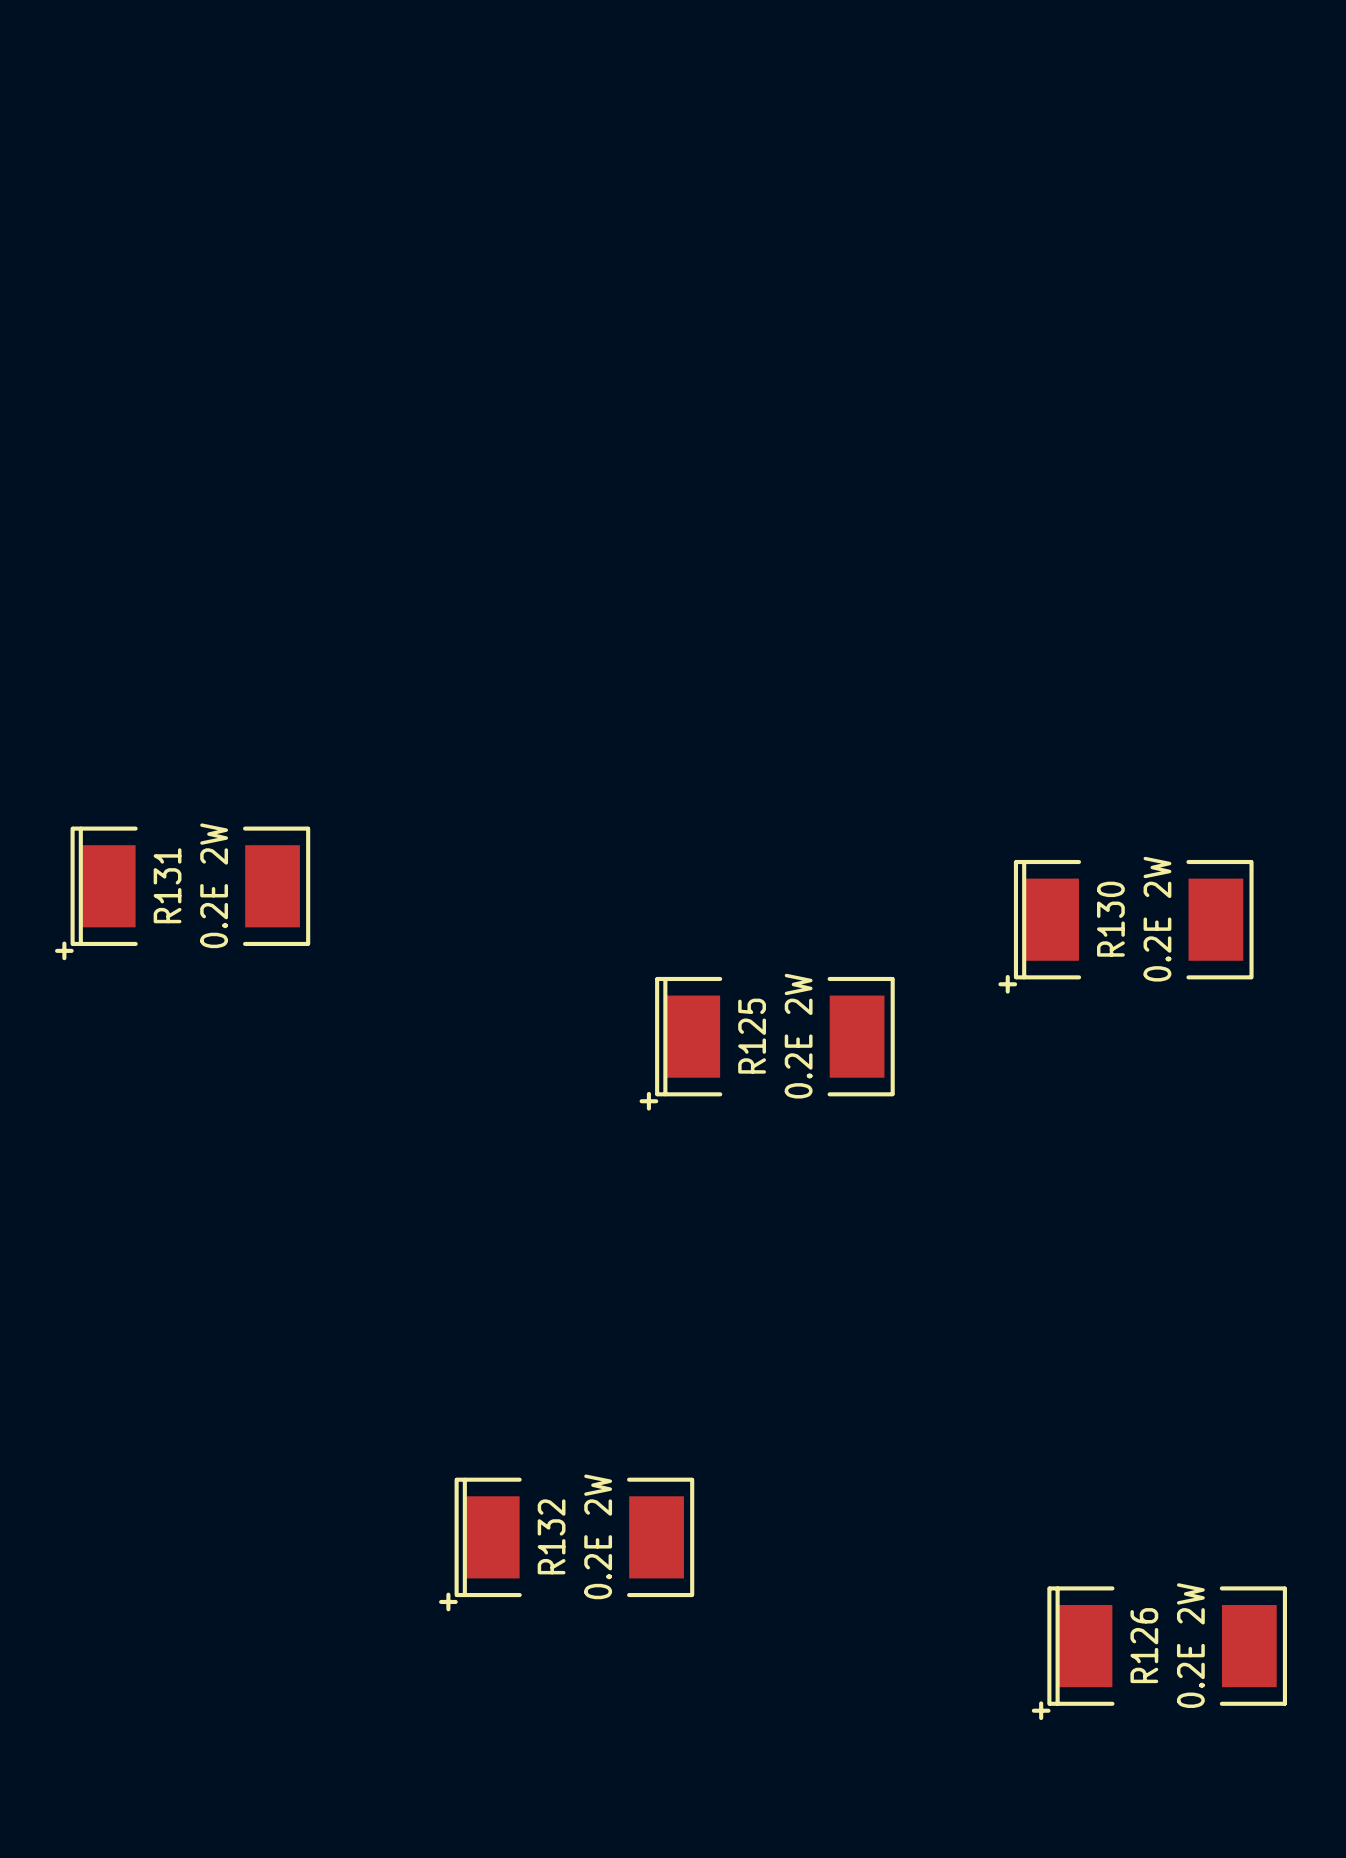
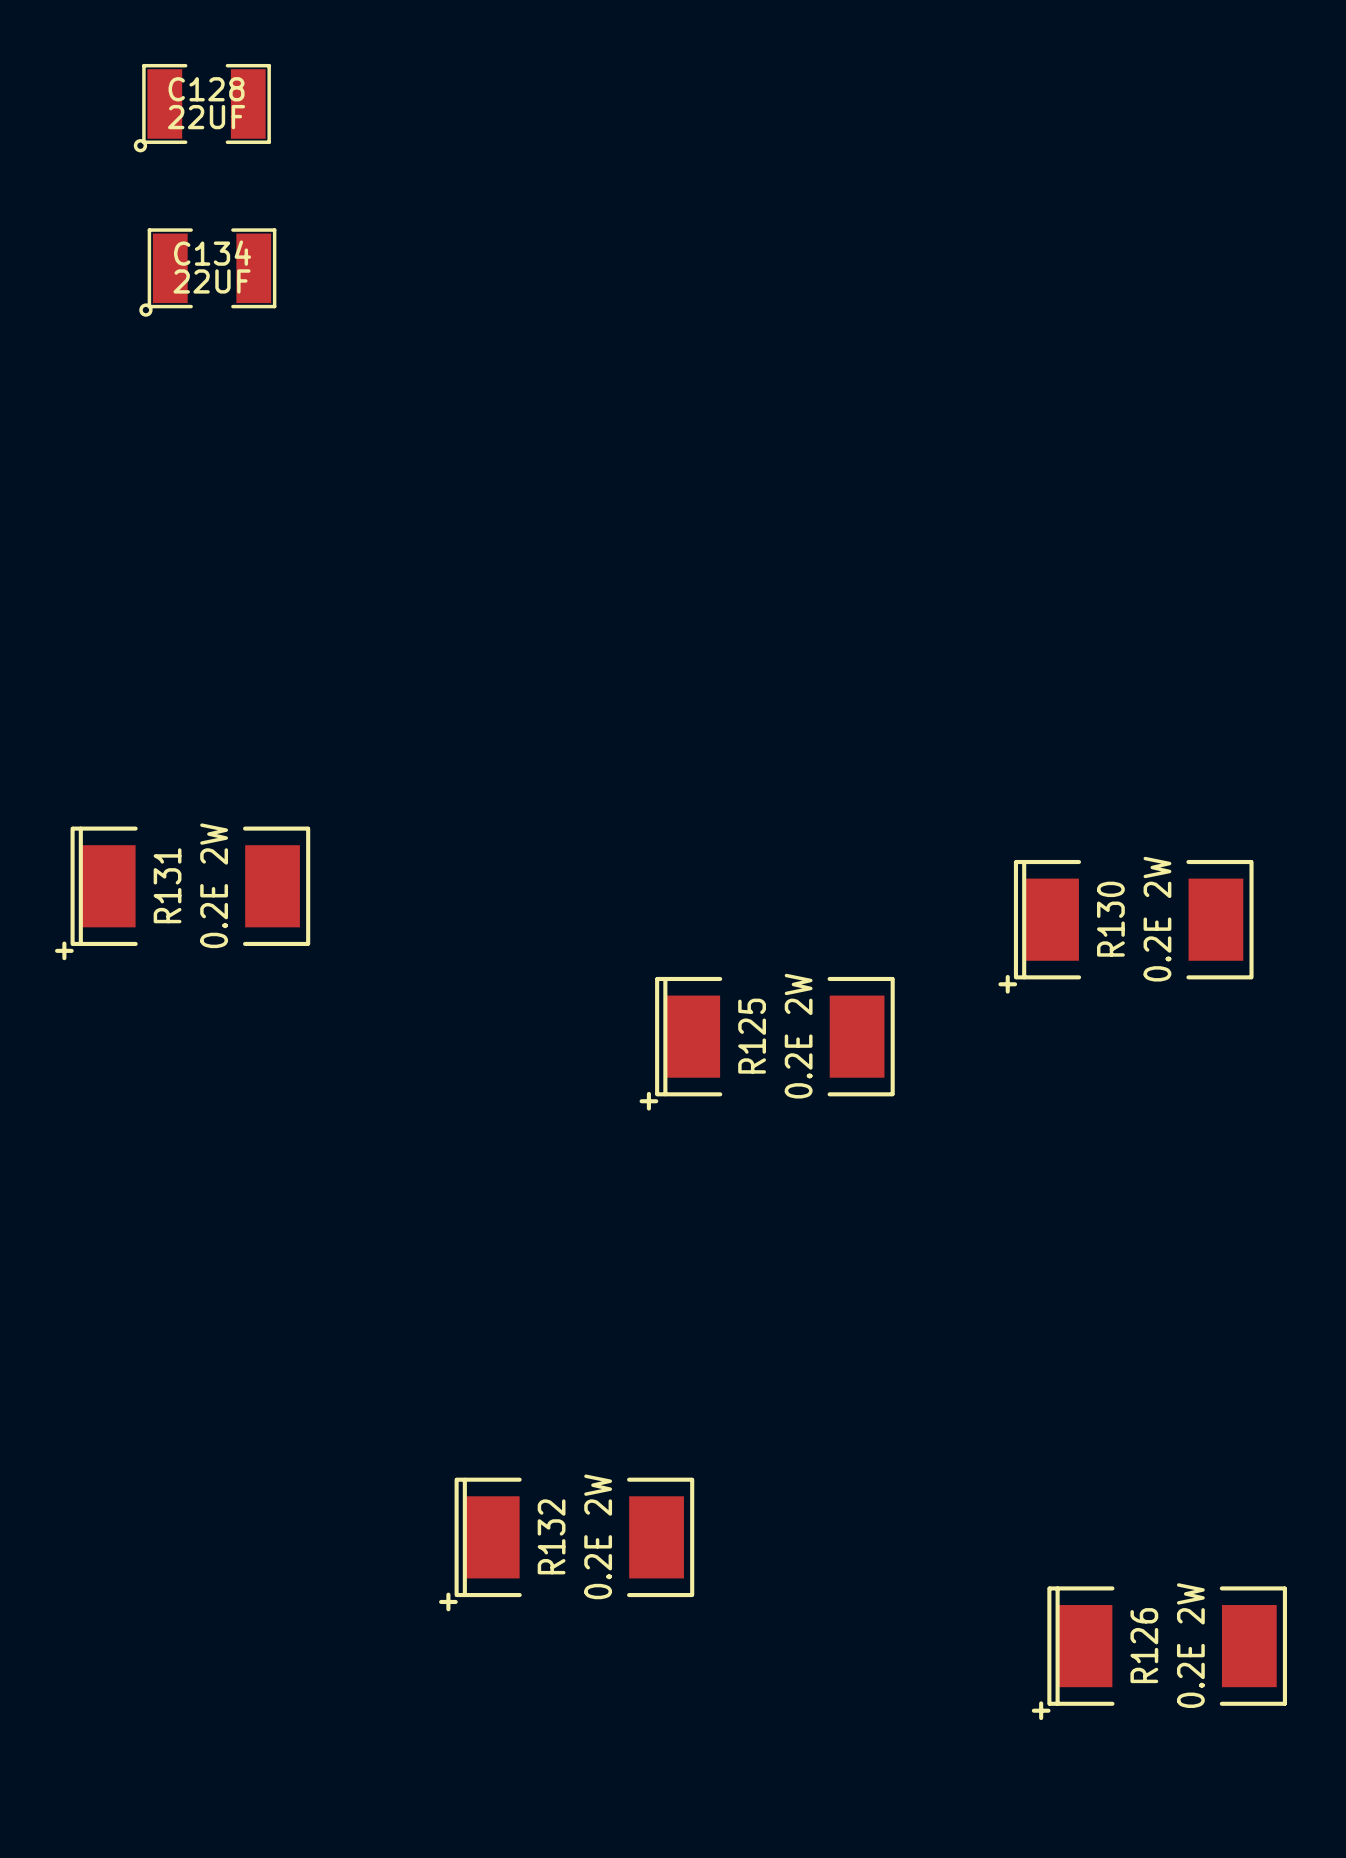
C128: none -> 22UF (202, 108)
C134: none -> 22UF (207, 272)

